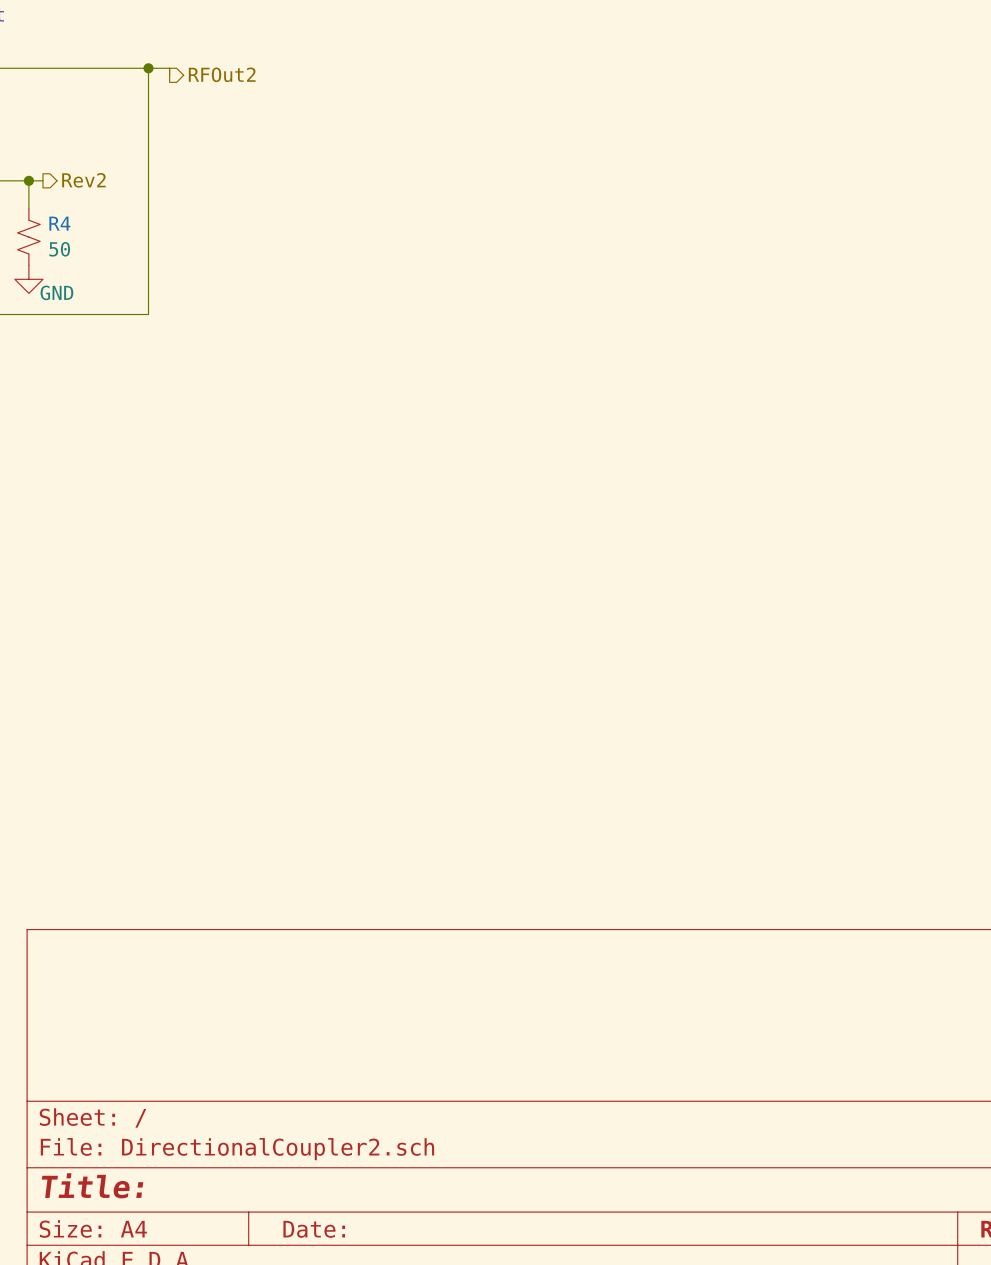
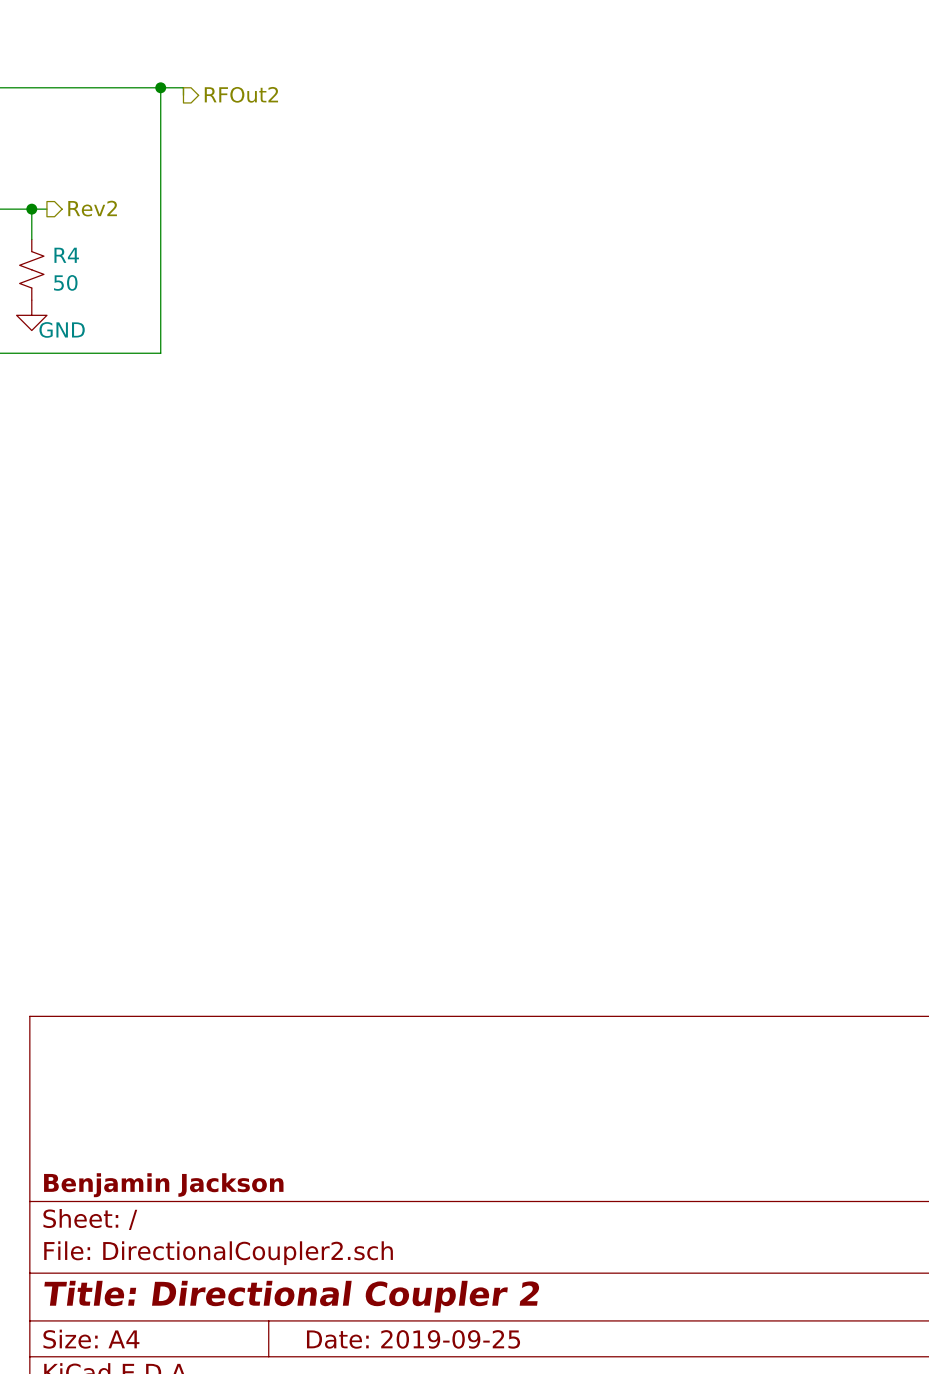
title block: none -> Benjamin Jackson (163, 1185)
title block: Title: (92, 1185) -> Title: Directional Coupler 2 (291, 1296)
title block: Date: (314, 1229) -> Date: 2019-09-25 (413, 1339)

